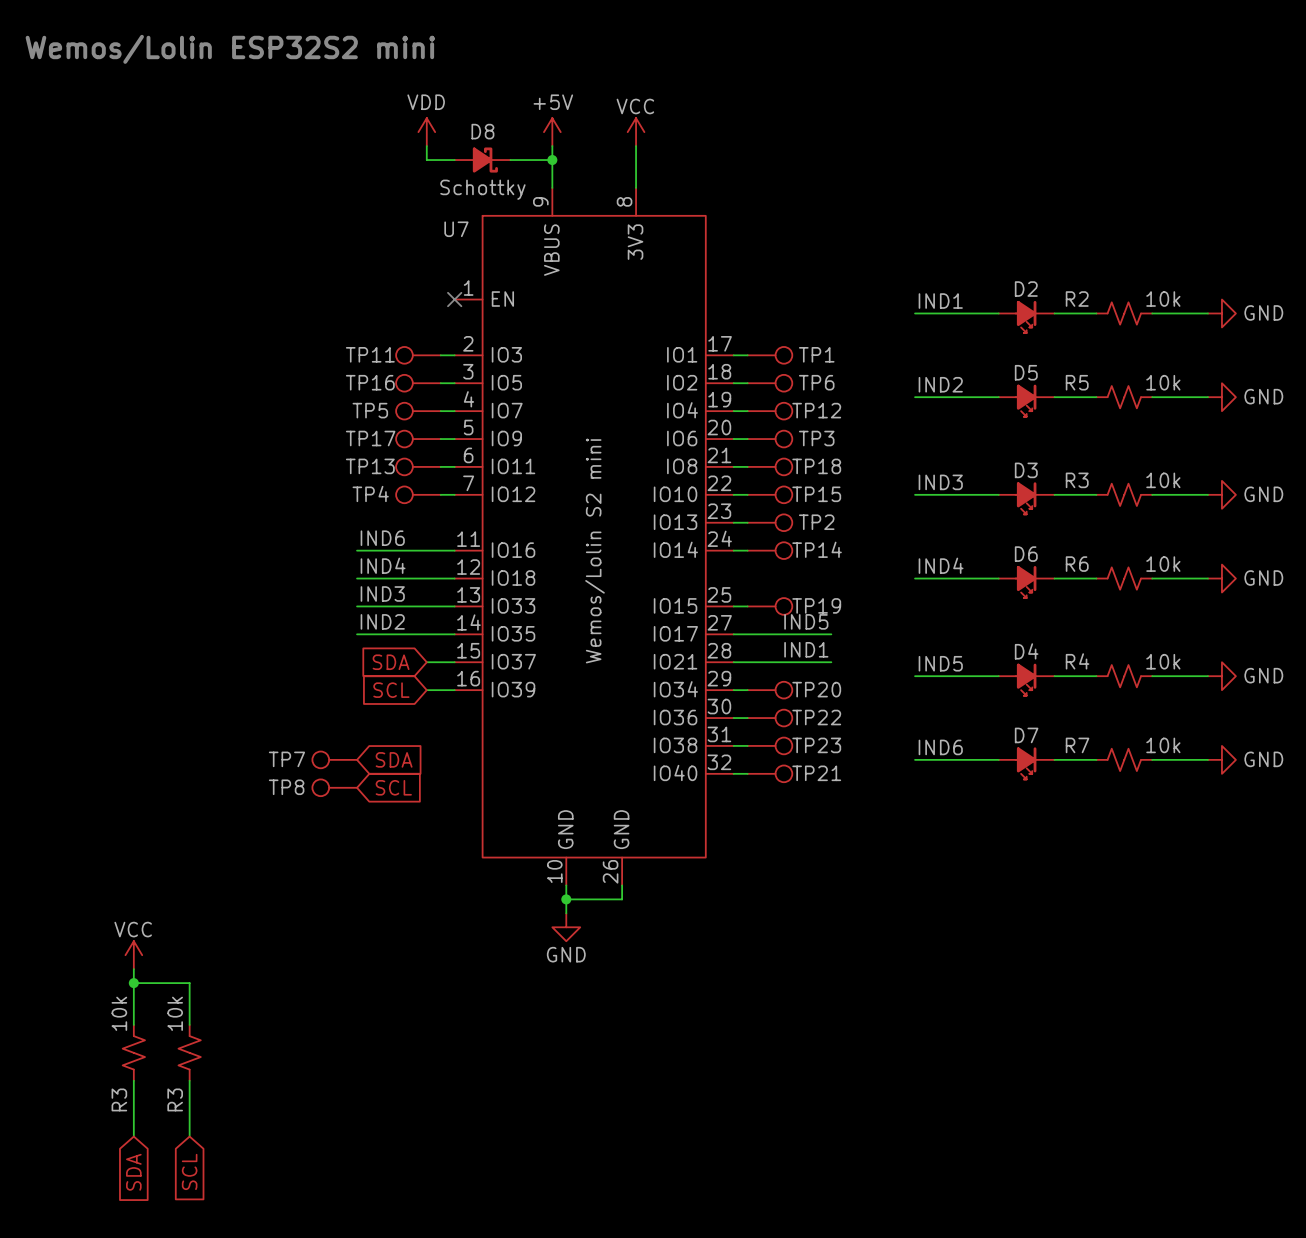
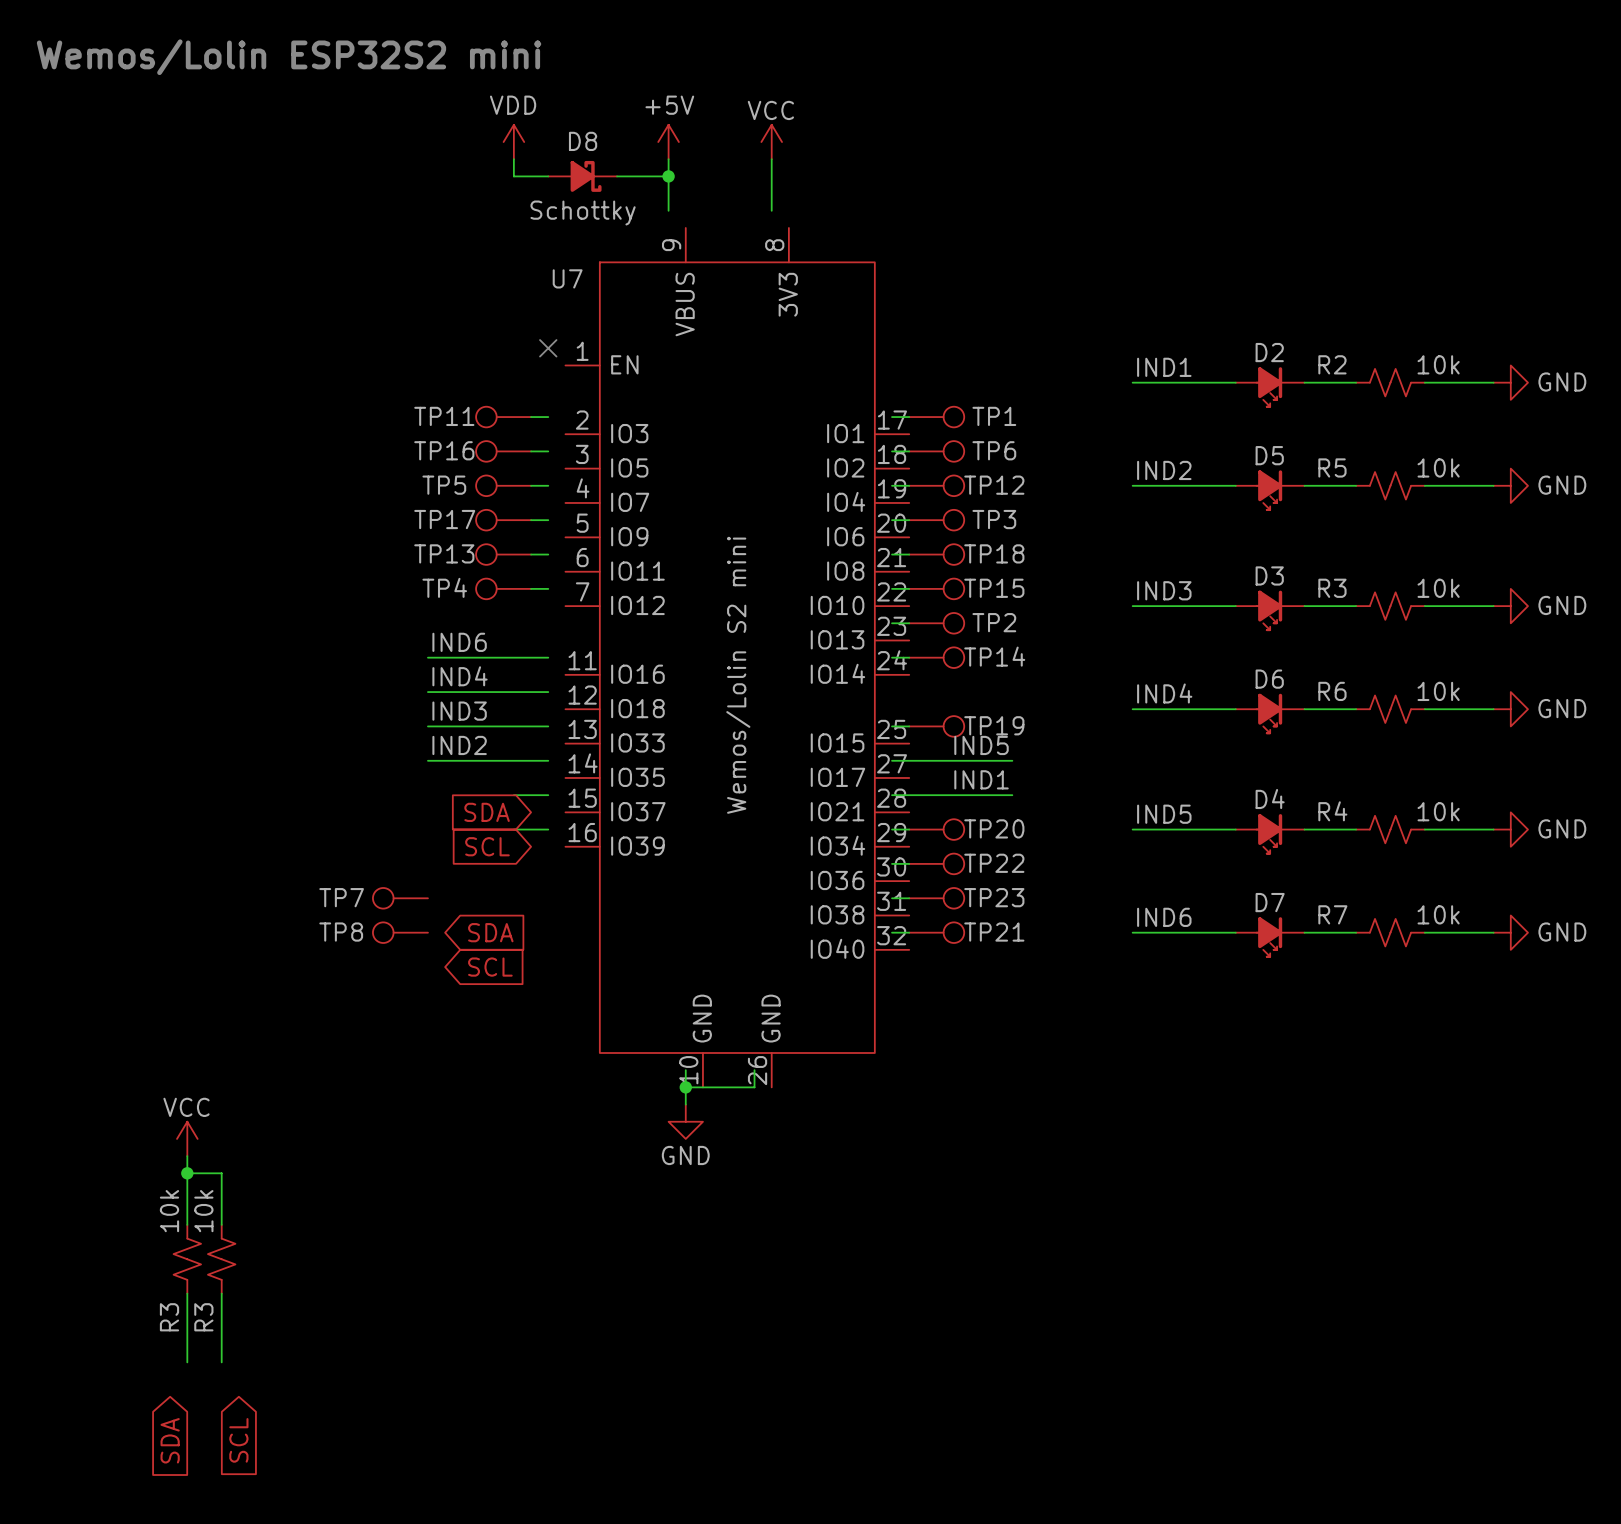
power symbol position: VDD (426, 132) -> VDD (513, 142)
power symbol position: +5V (552, 132) -> +5V (668, 142)
power symbol position: VCC (636, 132) -> VCC (771, 142)
wire: (426, 146) (426, 160) (454, 160) -> (513, 159) (513, 176) (548, 176)
wire: (552, 146) (552, 187) -> (668, 159) (668, 210)
wire: (636, 146) (636, 187) -> (771, 159) (771, 210)
D8 position: (482, 160) -> (582, 176)
wire: (510, 160) (552, 160) -> (617, 176) (668, 176)
junction position: (552, 160) -> (668, 176)
no-connect mark position: (454, 299) -> (548, 348)
TP11 position: (418, 355) -> (503, 417)
wire: (440, 355) (454, 355) -> (531, 417) (548, 417)
wire: (733, 355) (747, 355) -> (892, 417) (909, 417)
TP1 position: (769, 355) -> (936, 417)
TP16 position: (418, 383) -> (503, 451)
wire: (440, 383) (454, 383) -> (531, 451) (548, 451)
wire: (733, 383) (747, 383) -> (892, 451) (909, 451)
TP6 position: (769, 383) -> (936, 451)
TP5 position: (418, 411) -> (503, 485)
wire: (440, 411) (454, 411) -> (531, 485) (548, 485)
wire: (733, 411) (747, 411) -> (892, 485) (909, 485)
TP12 position: (769, 411) -> (936, 485)
TP17 position: (418, 439) -> (503, 520)
wire: (440, 439) (454, 439) -> (531, 520) (548, 520)
wire: (733, 439) (747, 439) -> (892, 520) (909, 520)
TP3 position: (769, 439) -> (936, 520)
TP13 position: (418, 466) -> (503, 554)
wire: (440, 466) (454, 466) -> (531, 554) (548, 554)
wire: (733, 466) (747, 466) -> (892, 554) (909, 554)
TP18 position: (769, 466) -> (936, 554)
TP4 position: (418, 494) -> (503, 588)
wire: (440, 494) (454, 494) -> (531, 588) (548, 588)
wire: (733, 494) (747, 494) -> (892, 588) (909, 588)
TP15 position: (769, 494) -> (936, 588)
wire: (733, 522) (747, 522) -> (892, 623) (909, 623)
TP2 position: (769, 522) -> (936, 623)
label position: IND6 (382, 538) -> IND6 (459, 642)
wire: (357, 550) (454, 550) -> (427, 657) (548, 657)
wire: (733, 550) (747, 550) -> (892, 657) (909, 657)
TP14 position: (769, 550) -> (936, 657)
label position: IND4 (383, 565) -> IND4 (460, 676)
wire: (357, 578) (454, 578) -> (427, 692) (548, 692)
label position: IND3 (382, 593) -> IND3 (459, 711)
wire: (357, 606) (454, 606) -> (427, 726) (548, 726)
wire: (733, 606) (747, 606) -> (892, 726) (909, 726)
TP19 position: (769, 606) -> (936, 726)
label position: IND2 (382, 621) -> IND2 (459, 745)
label position: IND5 (806, 621) -> IND5 (981, 745)
wire: (357, 634) (454, 634) -> (427, 760) (548, 760)
wire: (733, 634) (831, 634) -> (892, 760) (1012, 760)
label position: IND1 (806, 649) -> IND1 (981, 779)
wire: (426, 662) (454, 662) -> (513, 795) (548, 795)
wire: (733, 662) (831, 662) -> (892, 795) (1012, 795)
wire: (426, 690) (454, 690) -> (513, 829) (548, 829)
wire: (733, 690) (747, 690) -> (892, 829) (909, 829)
TP20 position: (769, 690) -> (936, 829)
wire: (733, 718) (747, 718) -> (892, 863) (909, 863)
TP22 position: (769, 718) -> (936, 863)
wire: (733, 745) (747, 745) -> (892, 898) (909, 898)
TP23 position: (769, 745) -> (936, 898)
TP7 position: (334, 759) -> (400, 898)
wire: (733, 773) (747, 773) -> (892, 932) (909, 932)
TP21 position: (769, 773) -> (936, 932)
TP8 position: (334, 787) -> (400, 932)
wire: (566, 885) (566, 913) -> (685, 1070) (685, 1104)
wire: (622, 885) (622, 899) (566, 899) -> (754, 1070) (754, 1087) (685, 1087)
junction position: (566, 899) -> (685, 1087)
power symbol position: GND (566, 927) -> GND (685, 1121)
power symbol position: VCC (133, 955) -> VCC (187, 1138)
wire: none -> (187, 1173) (221, 1173) (221, 1224)
wire: (133, 969) (133, 1024) -> (187, 1156) (187, 1224)
wire: (133, 983) (189, 983) (189, 1024) -> none
junction position: (133, 983) -> (187, 1173)
R3: none -> 10k (187, 1259)
R3: none -> 10k (221, 1259)
R3: 10k (133, 1052) -> none
R3: 10k (189, 1052) -> none
wire: (133, 1080) (133, 1136) -> (187, 1293) (187, 1362)
wire: (189, 1080) (189, 1136) -> (221, 1293) (221, 1362)

